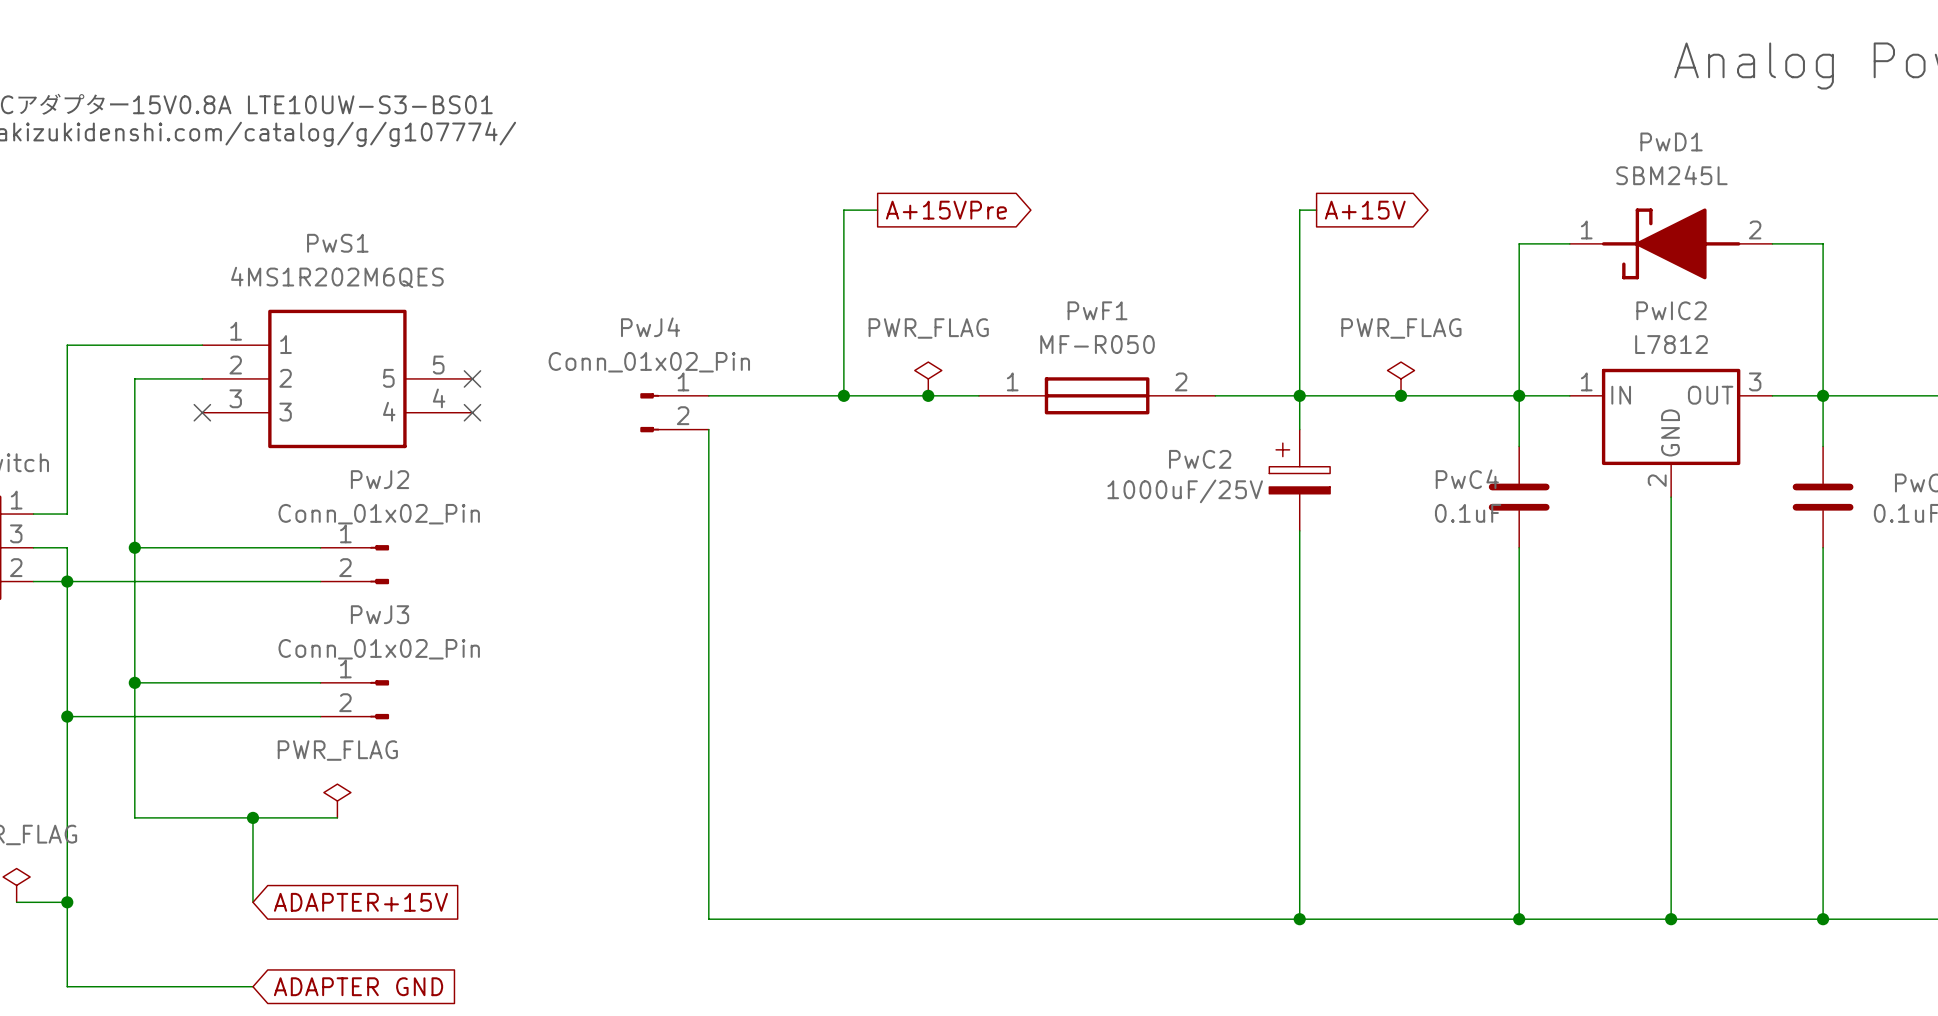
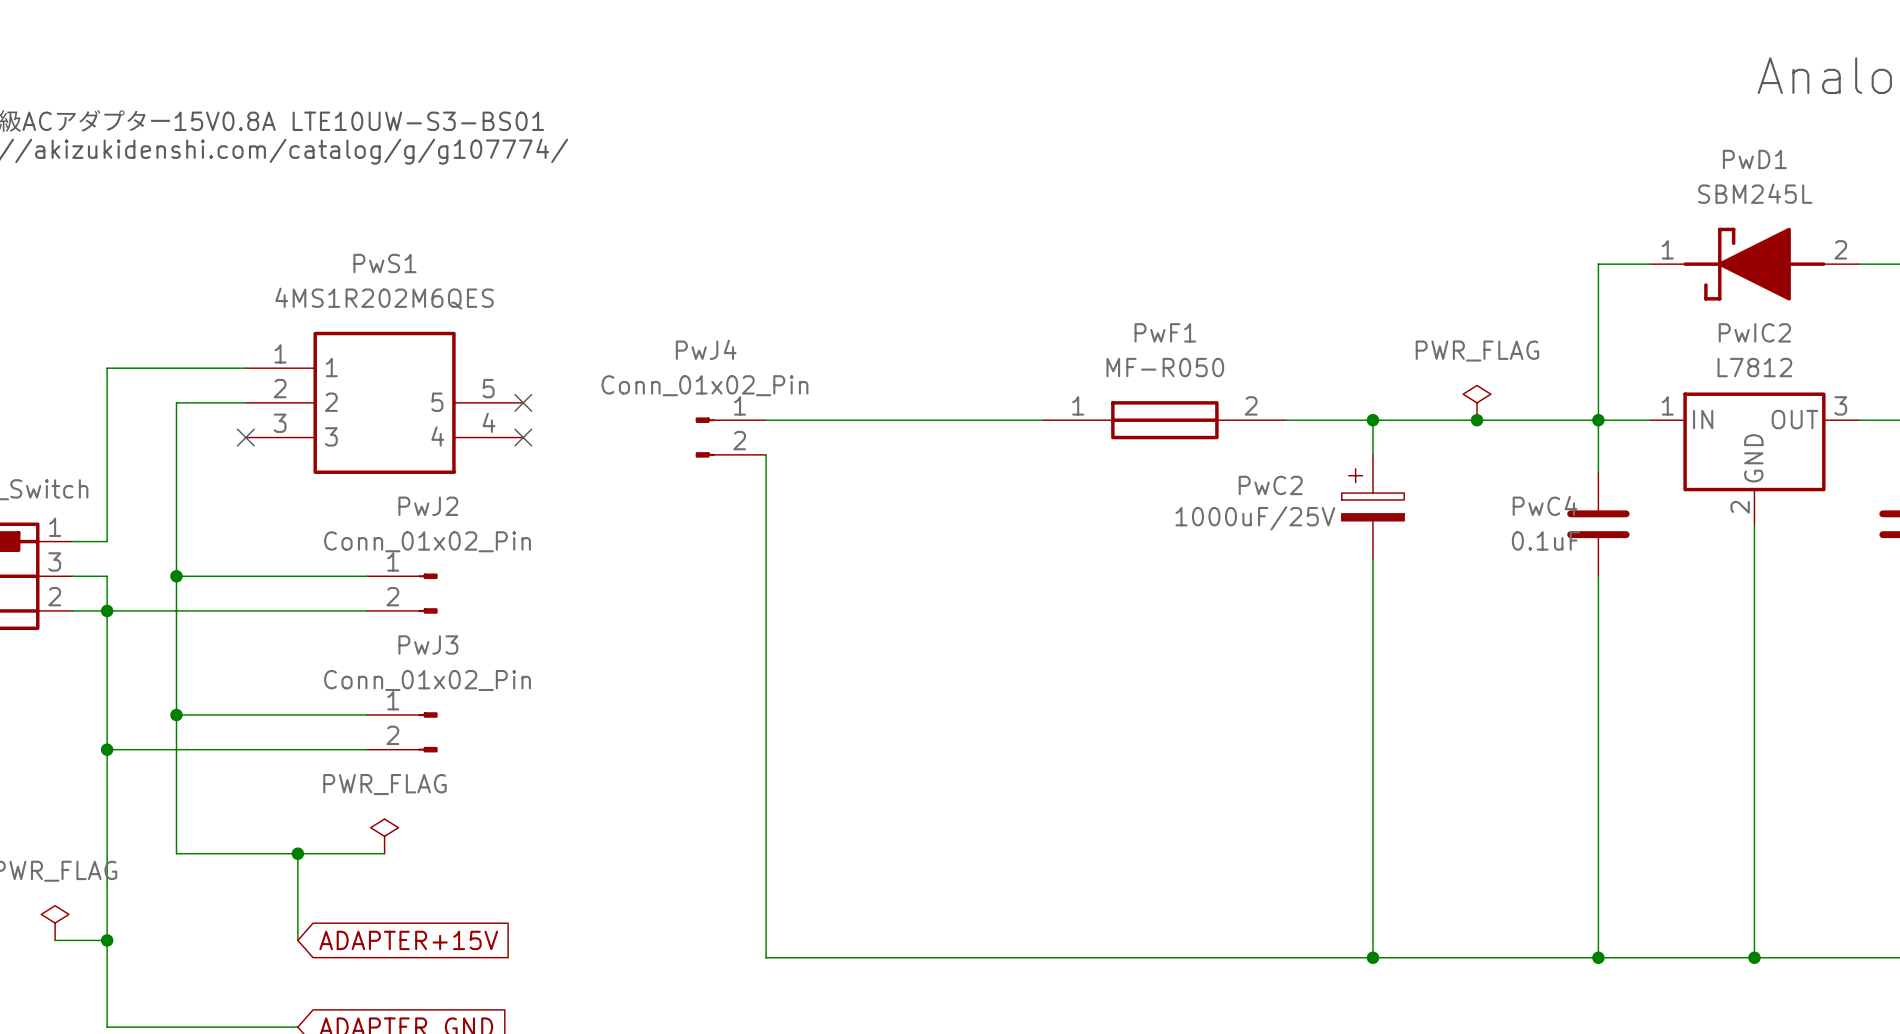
wire: (877, 210) (843, 210) (843, 395) -> none
global label: A+15VPre (946, 210) -> none
wire: (1316, 210) (1299, 210) (1299, 395) -> none
global label: A+15V (1365, 210) -> none
power symbol: PWR_FLAG (928, 378) -> none
junction: (843, 395) -> none
junction: (928, 395) -> none

